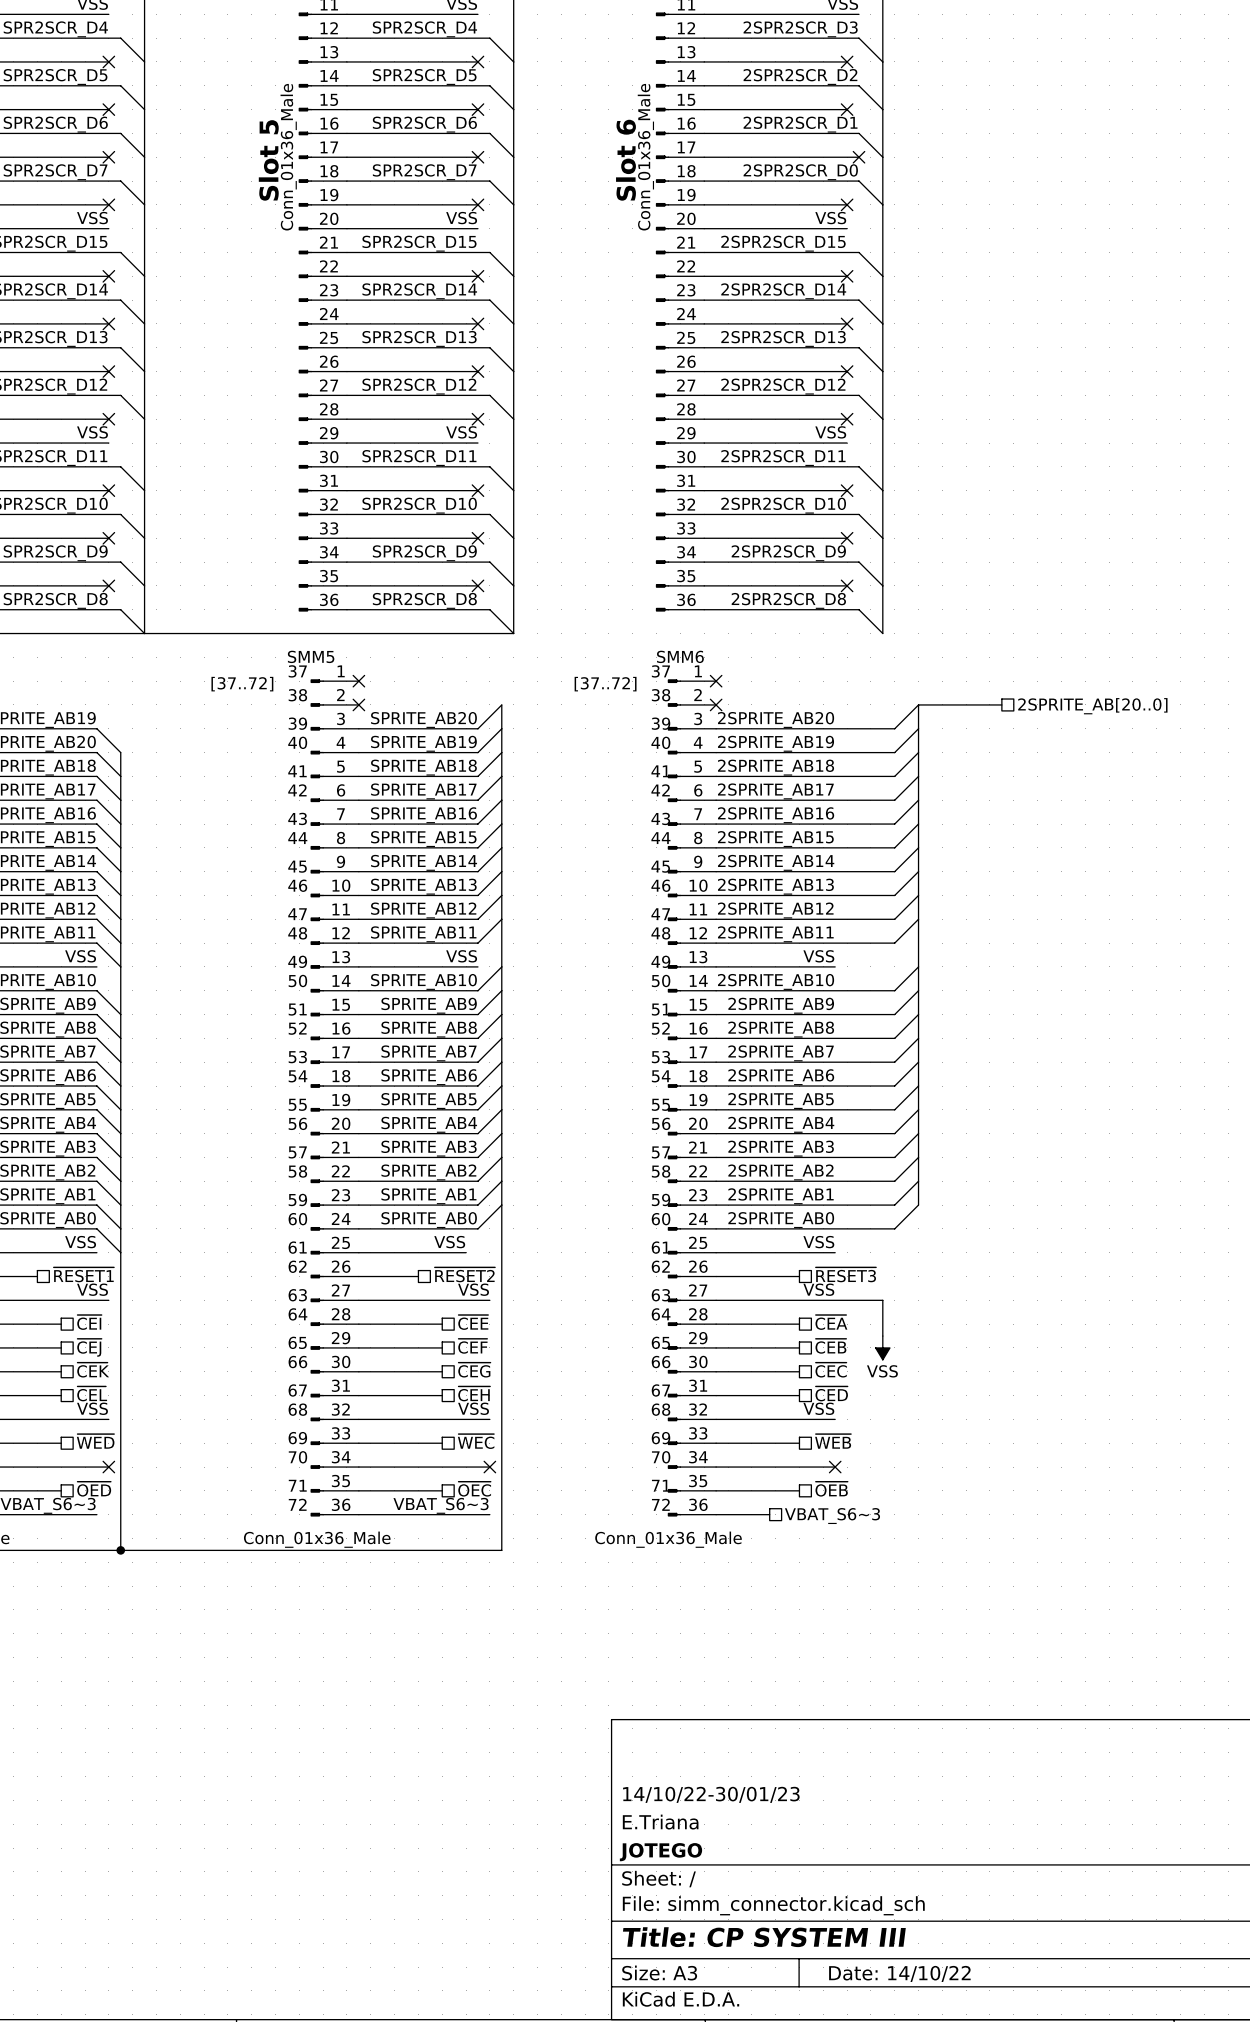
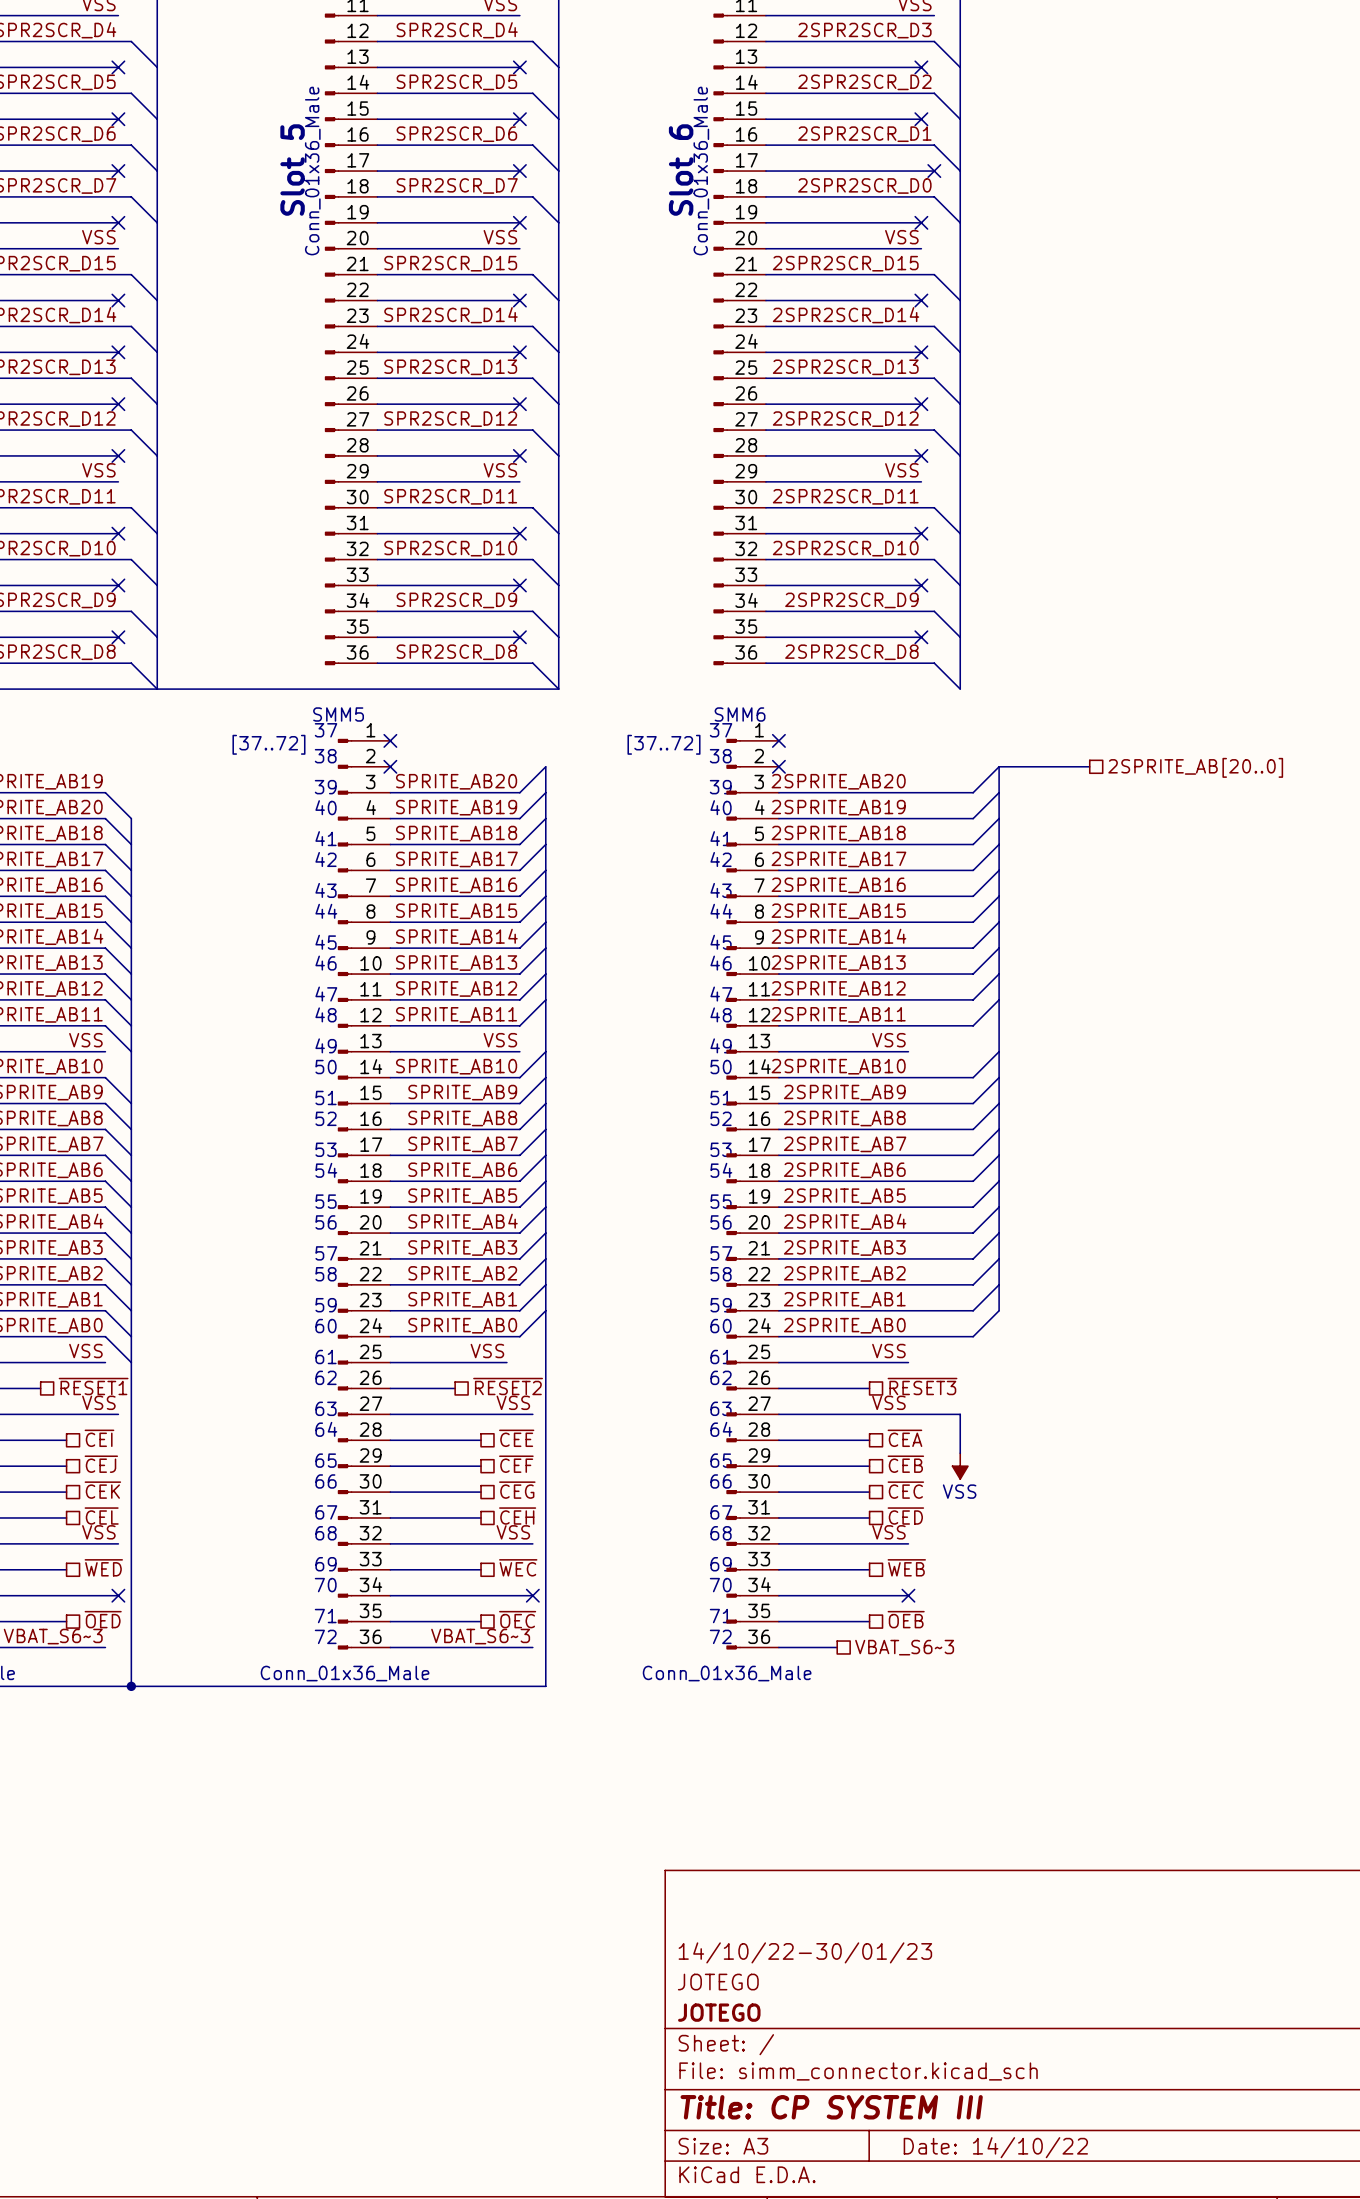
title block: E.Triana (660, 1822) -> JOTEGO (718, 1982)

